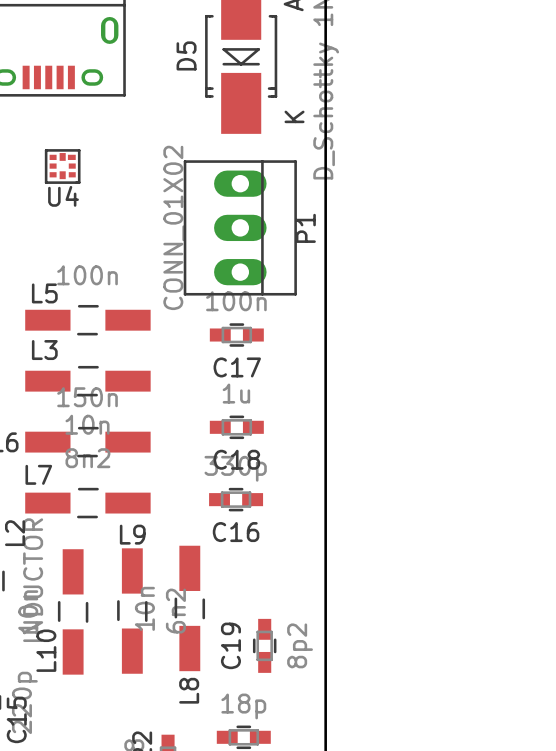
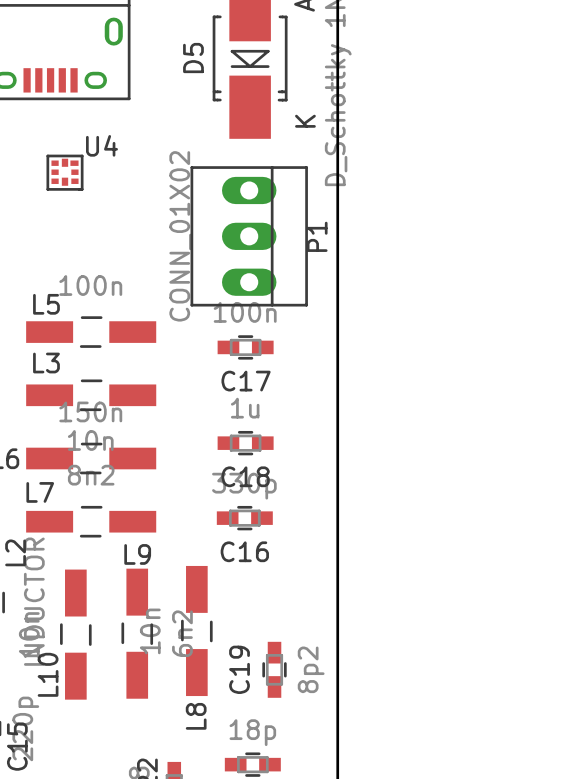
U4 name position: U4 (63, 196) -> U4 (101, 145)

